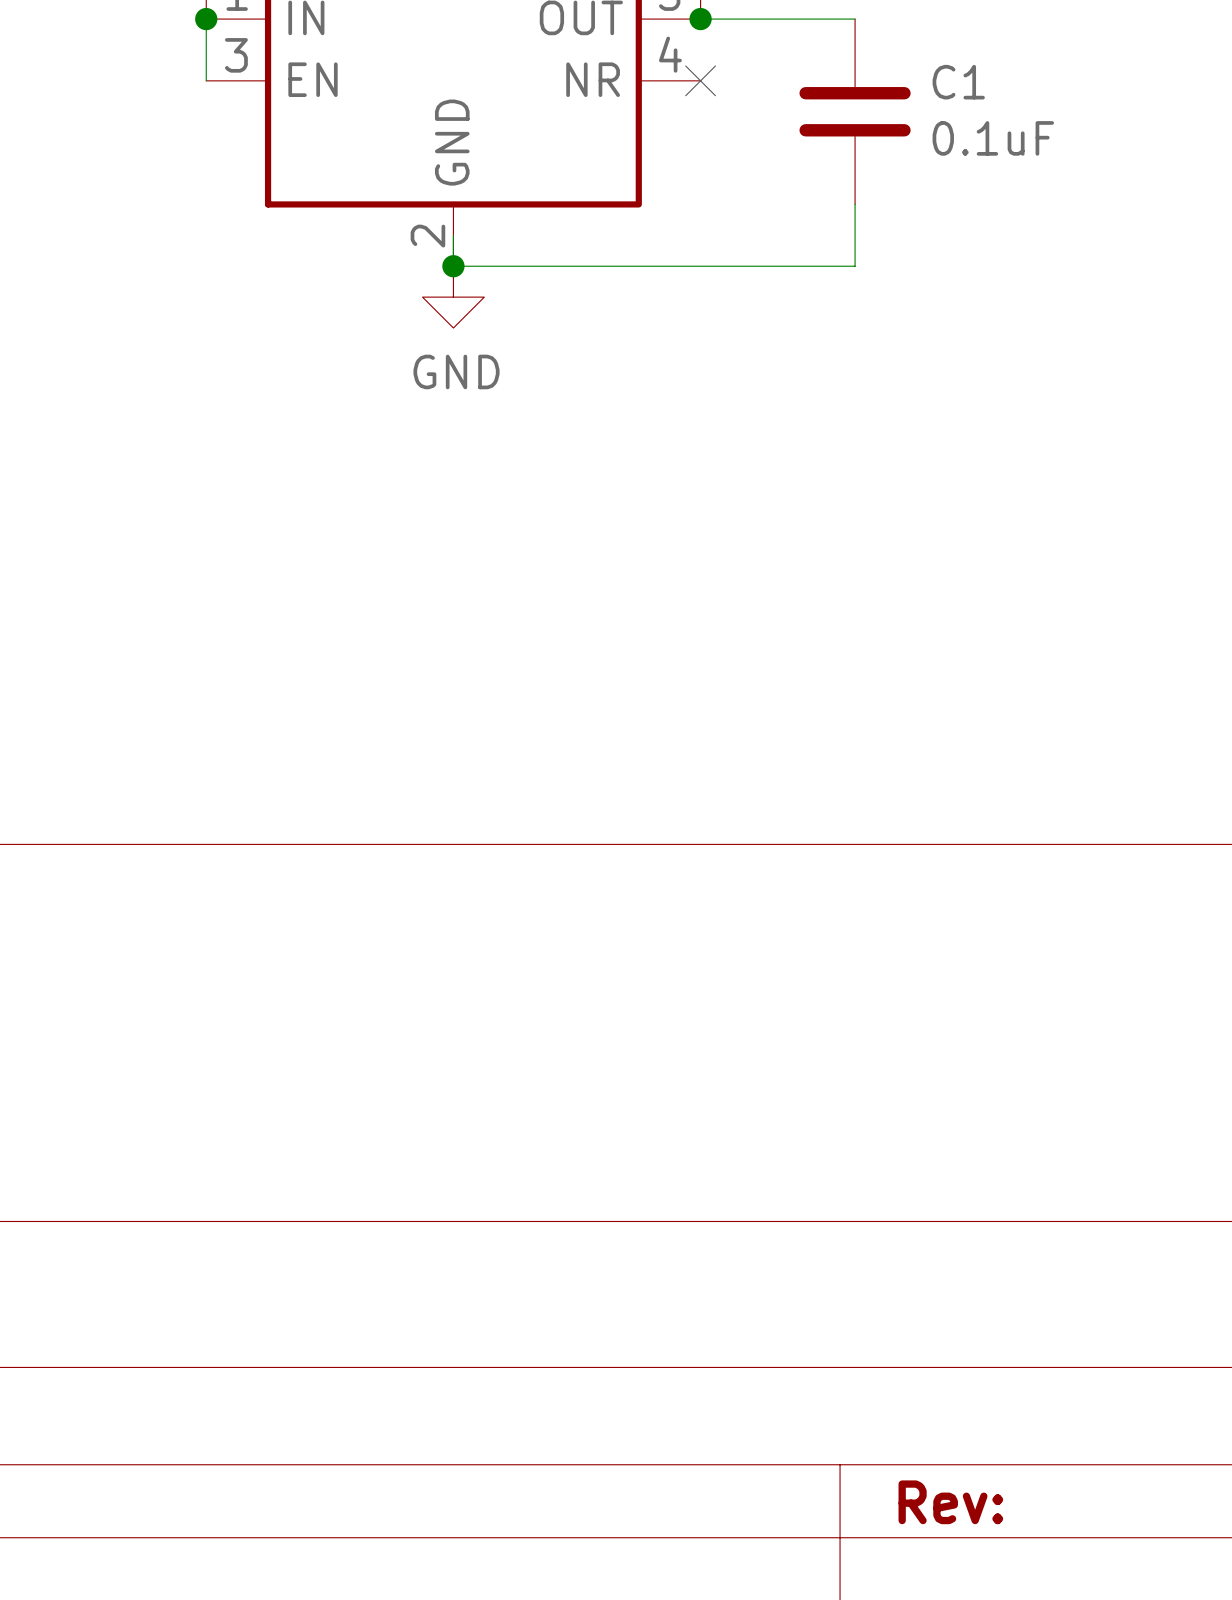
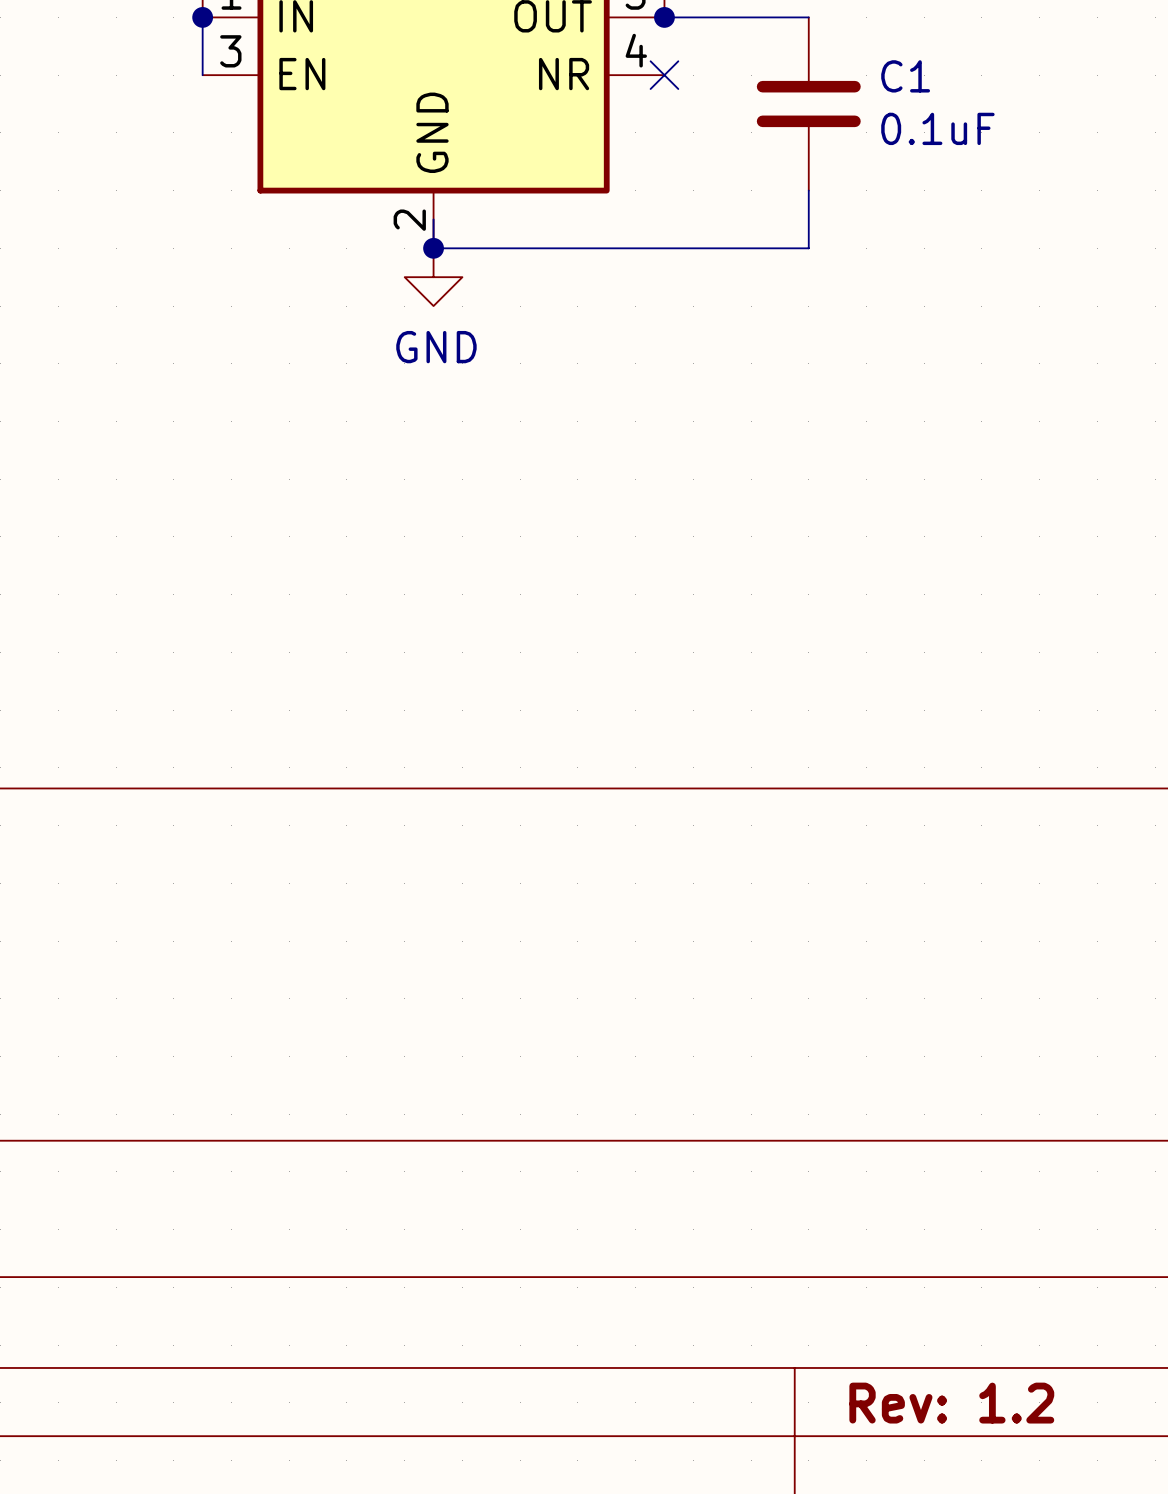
title block: Rev: (950, 1502) -> Rev: 1.2 (951, 1403)

